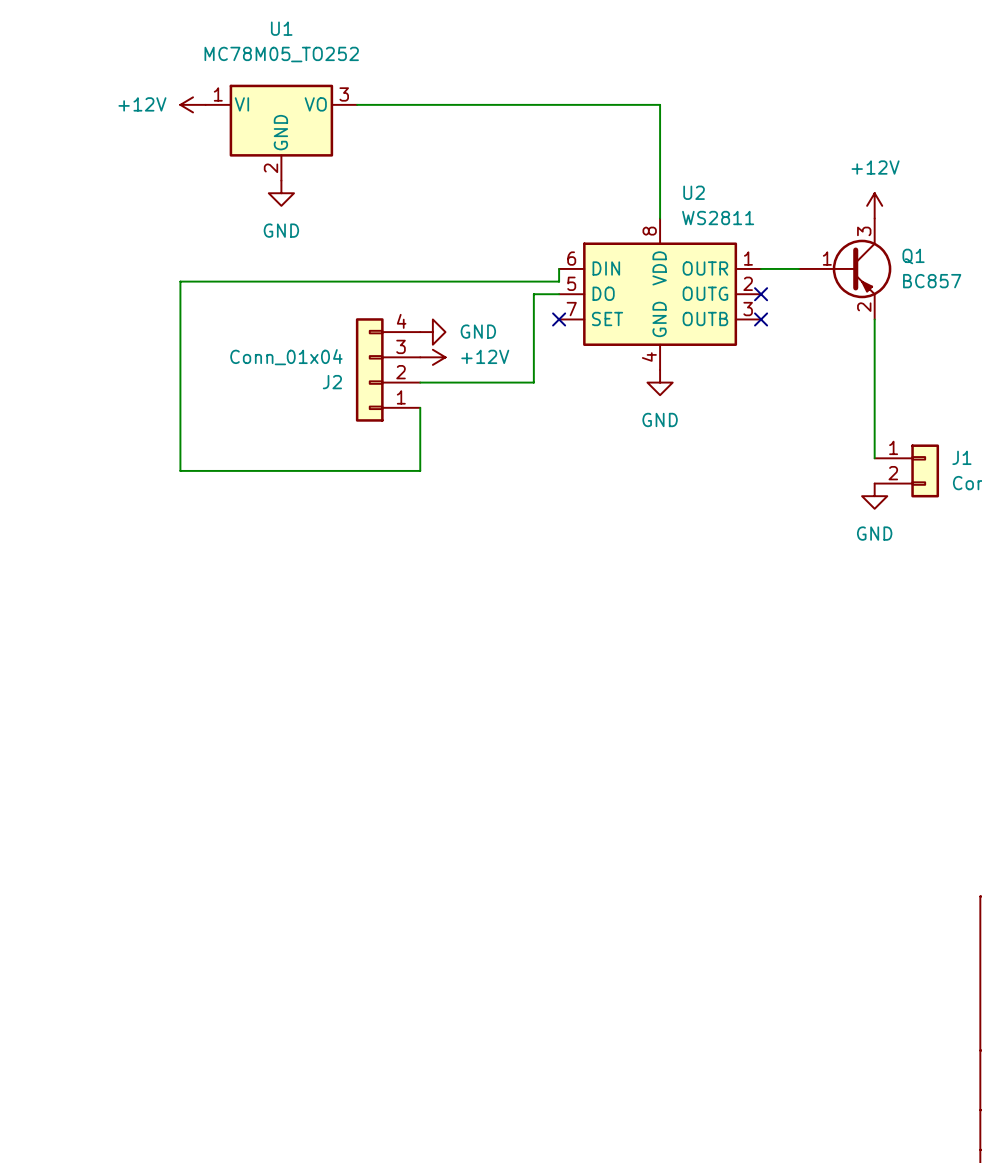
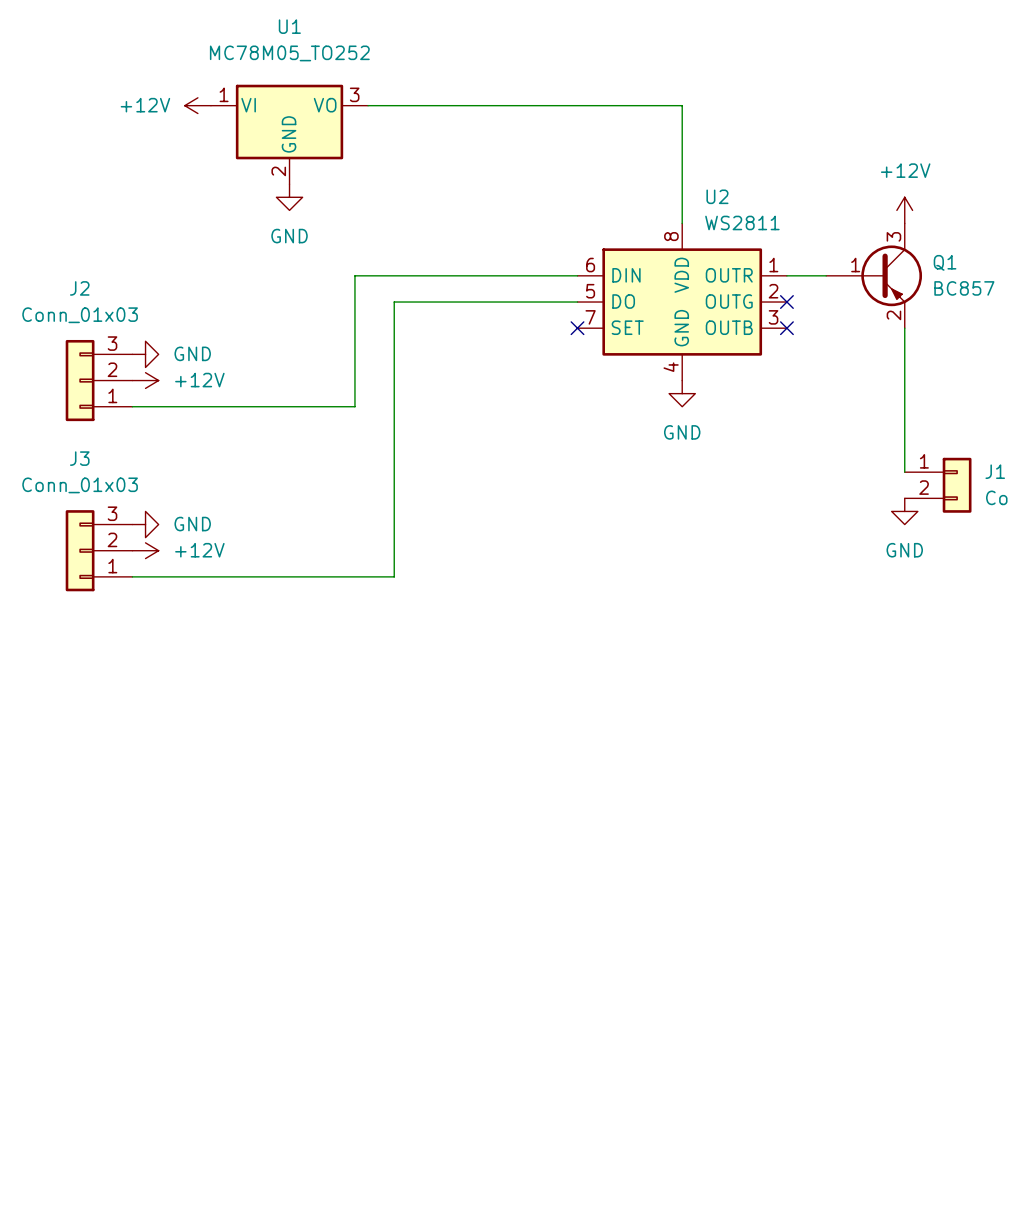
wire: (559, 268) (559, 281) (180, 281) (180, 470) (420, 470) (420, 407) -> (577, 275) (354, 275) (354, 406) (132, 406)
wire: (533, 294) (533, 382) (420, 382) -> (551, 302) (394, 302) (394, 576) (132, 576)
J2 symbol: [355, 318, 421, 422] -> [65, 339, 133, 422]
power symbol: GND (432, 332) -> none
power symbol: none -> GND (145, 354)
J2 value: Conn_01x04 (286, 357) -> Conn_01x03 (80, 315)
power symbol: +12V (432, 357) -> none
power symbol: none -> +12V (145, 380)
J2 name position: J2 (332, 382) -> J2 (79, 288)
power symbol: none -> GND (145, 524)
J3: none -> Conn_01x03 (99, 550)
power symbol: none -> +12V (145, 550)

